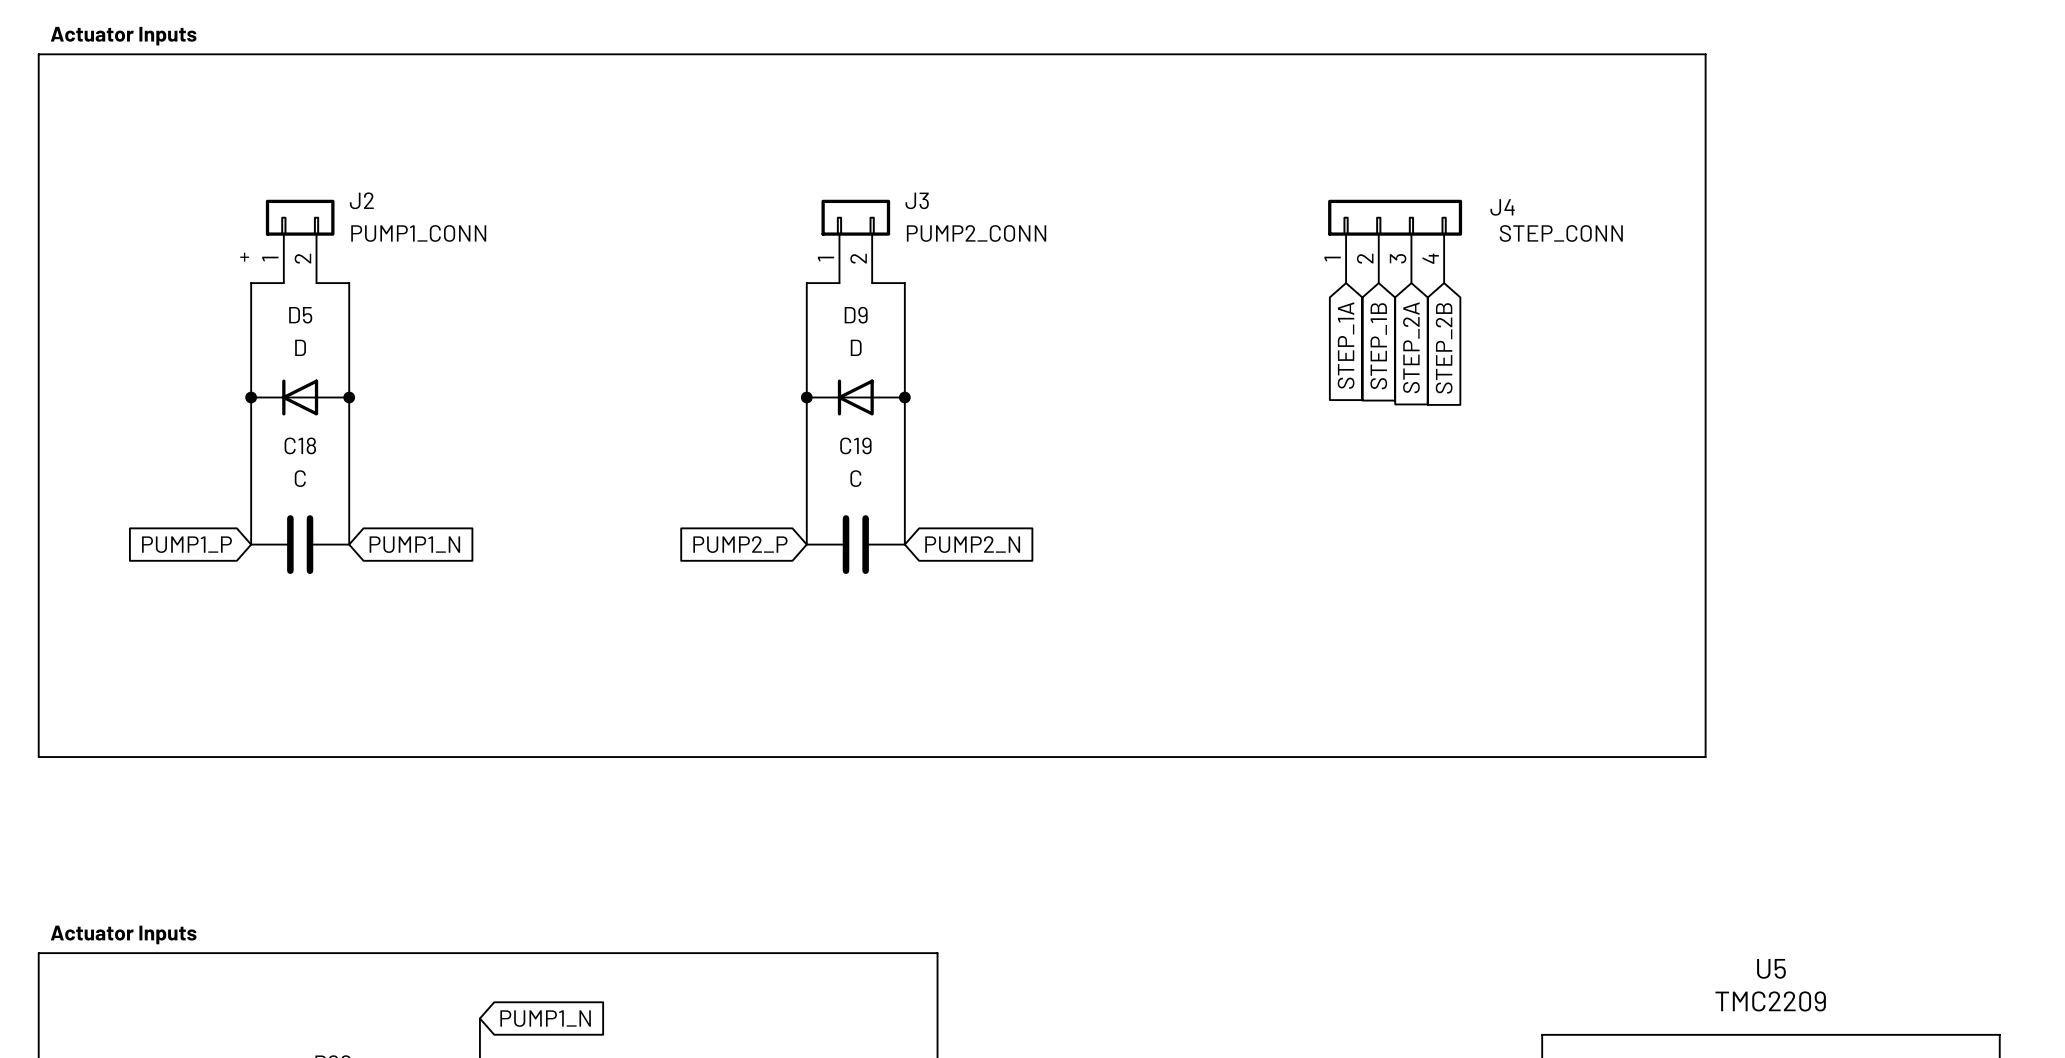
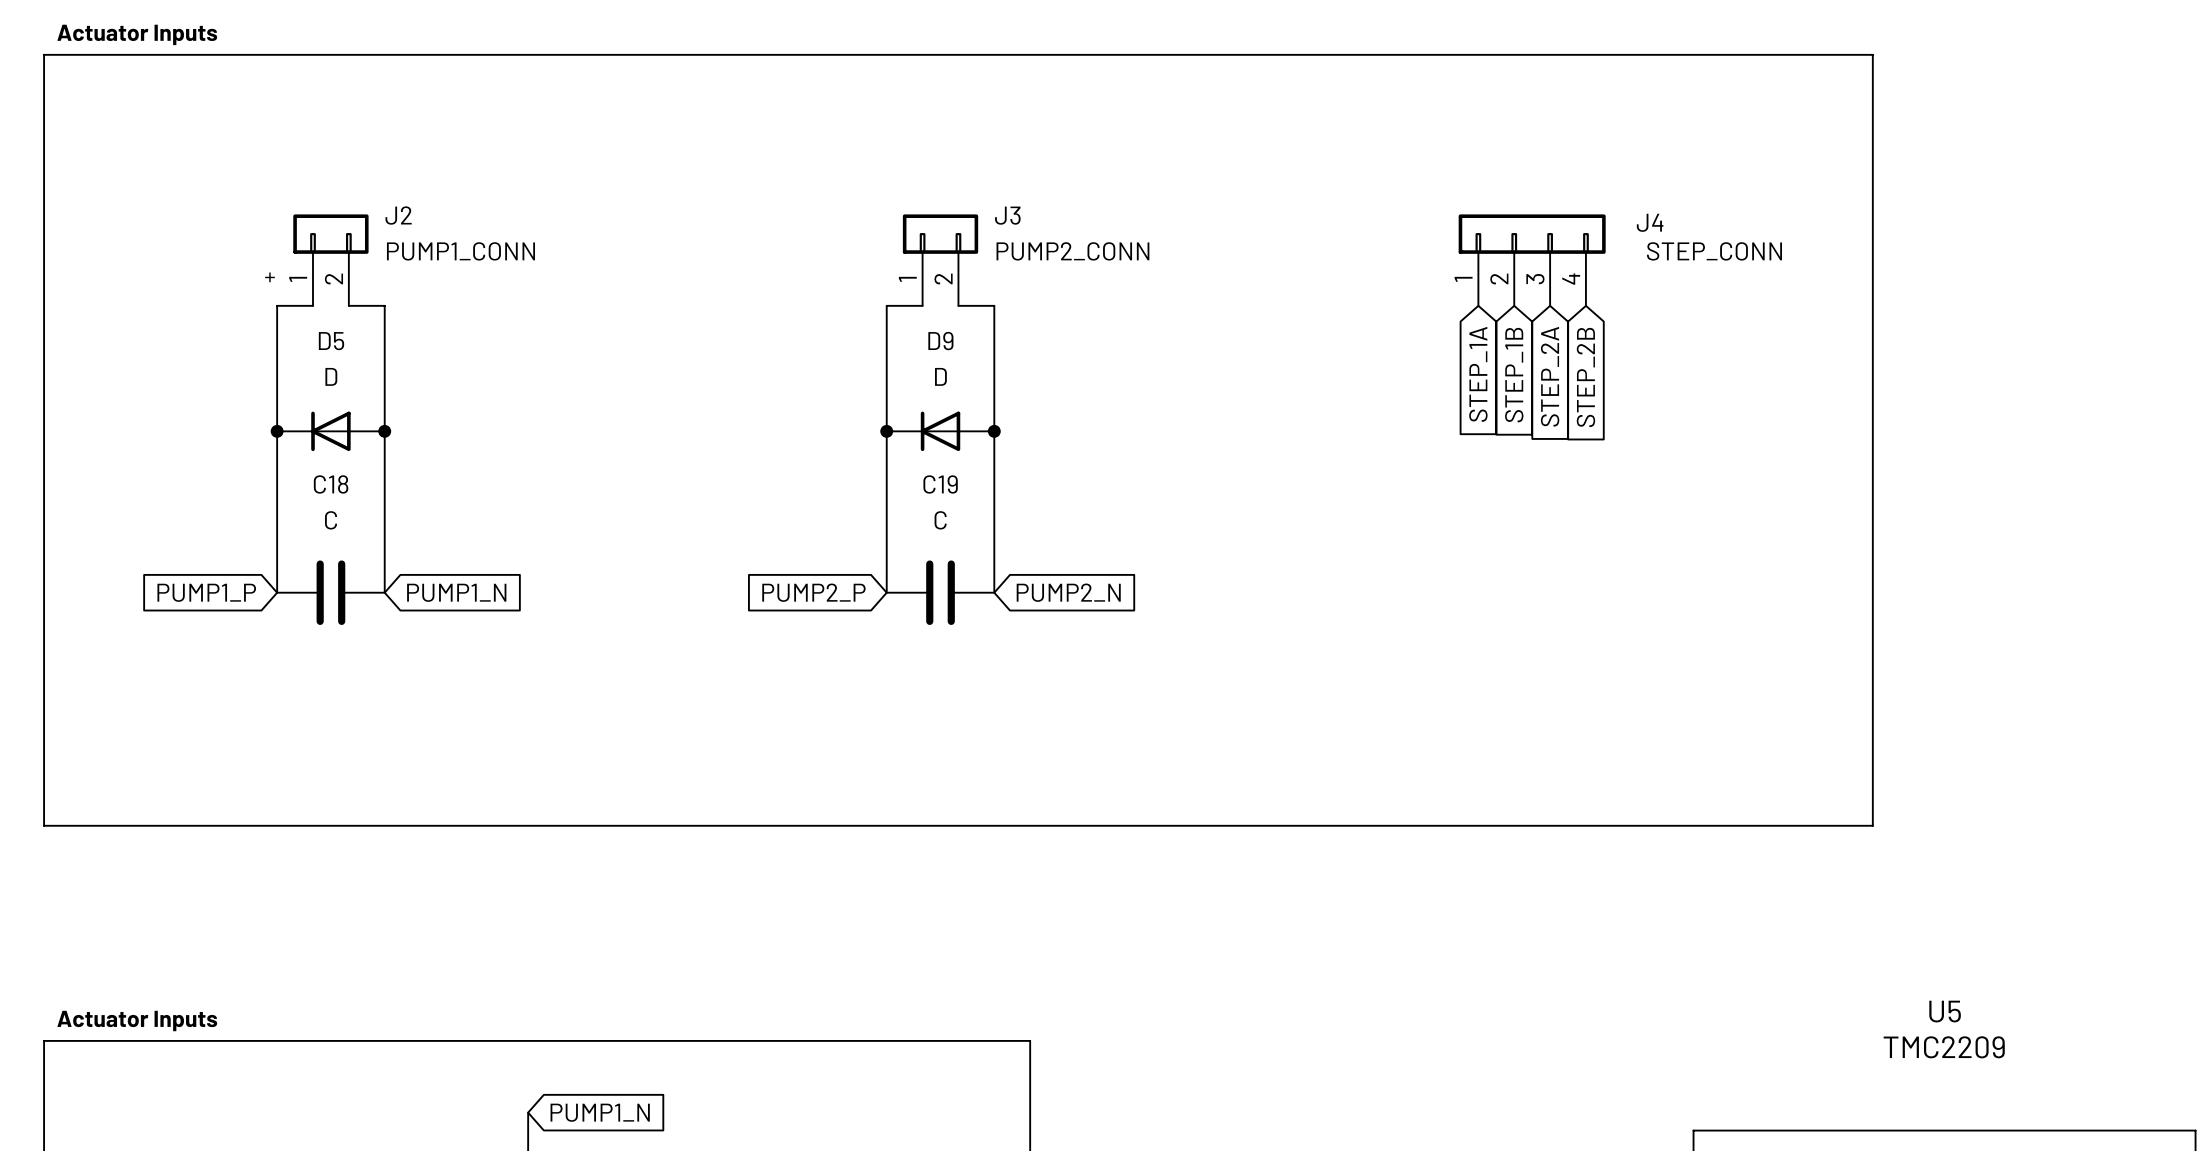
U5 name position: U5 (1771, 968) -> U5 (1945, 1011)
U5 value position: TMC2209 (1770, 1001) -> TMC2209 (1944, 1047)

